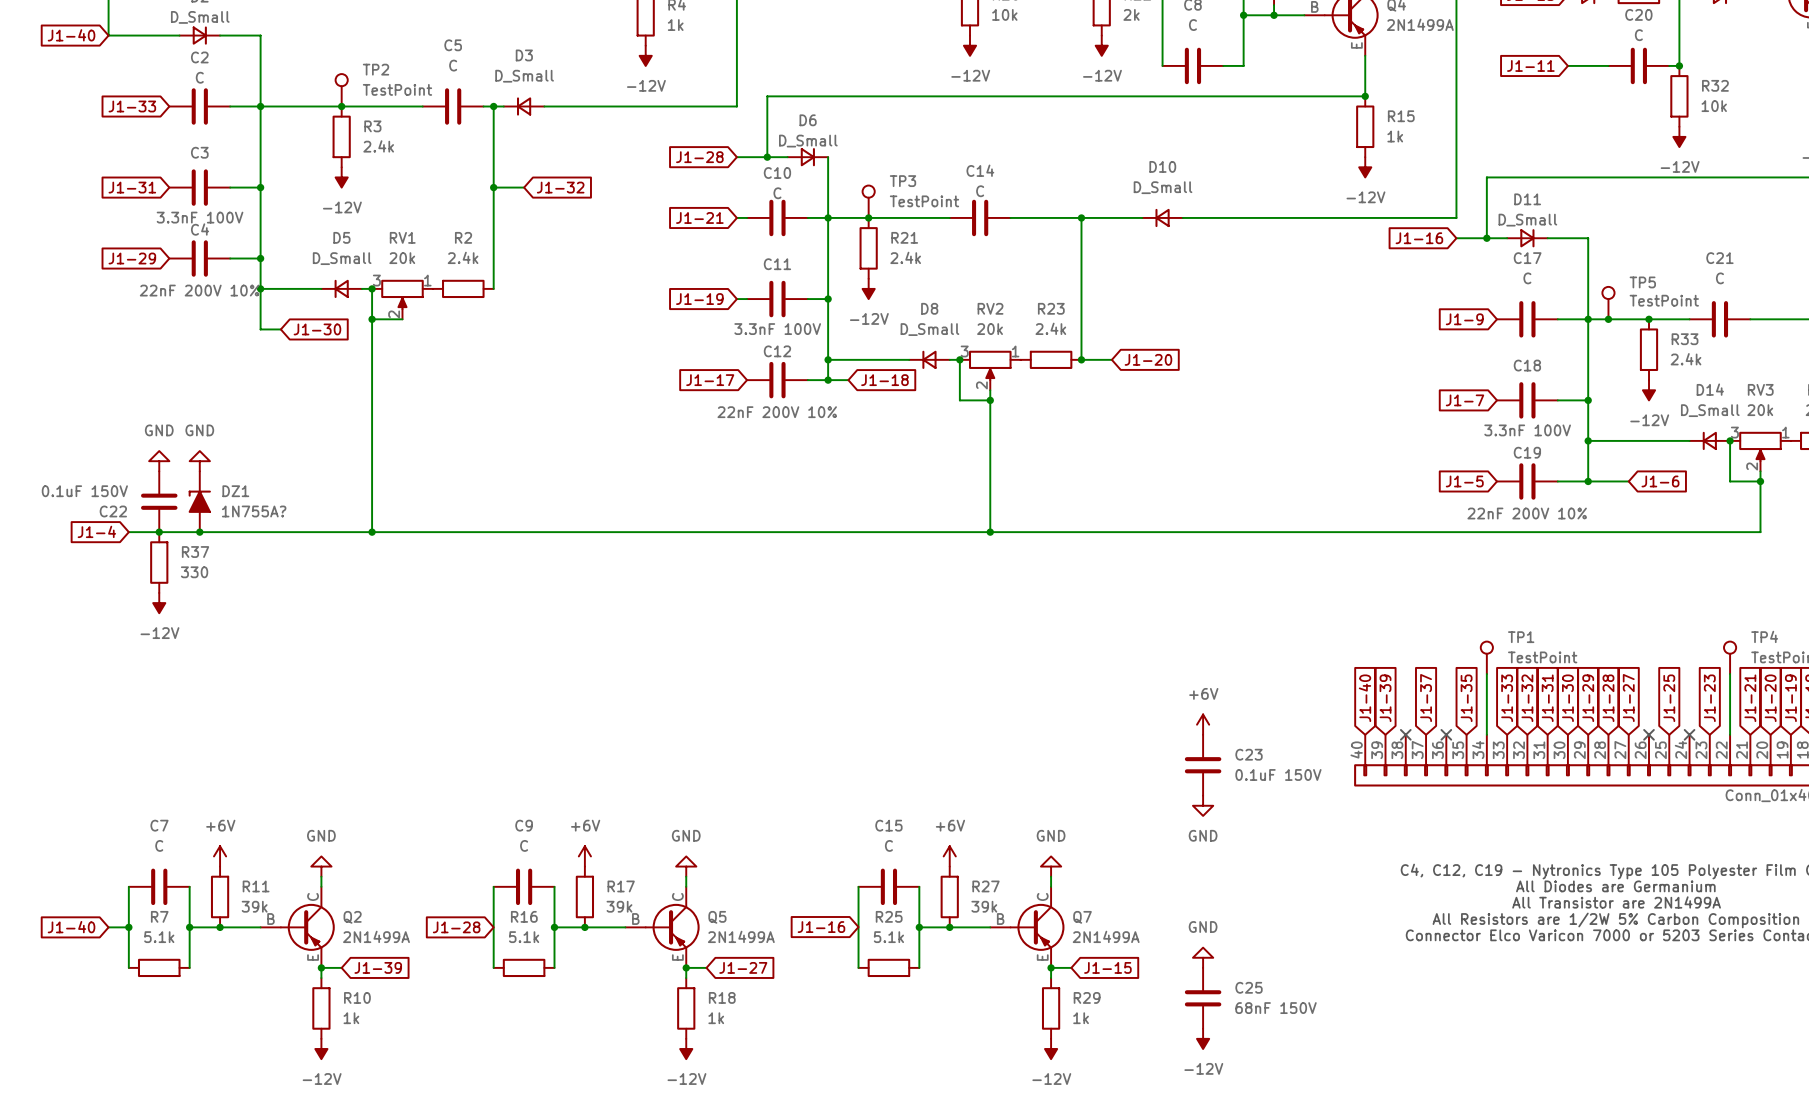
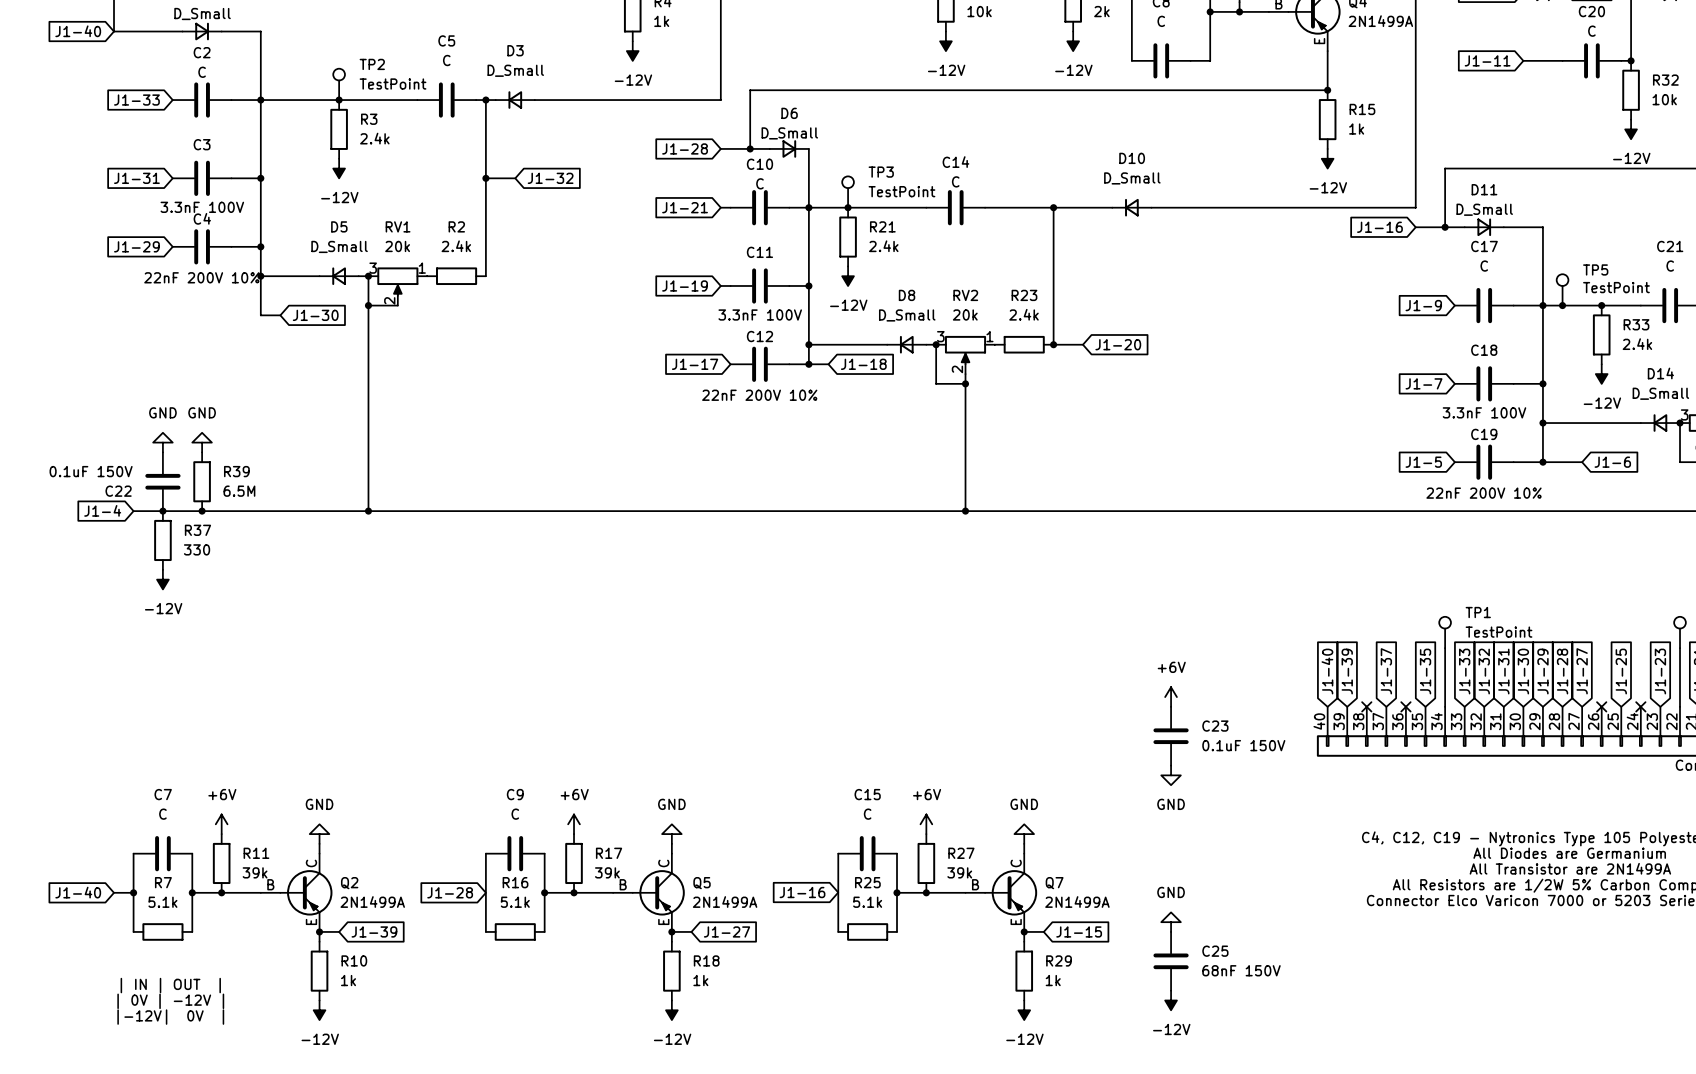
DZ1: 1N755A? (199, 501) -> none
R39: none -> 6.5M (202, 481)
text: none -> | IN | OUT | (170, 985)
text: none -> | 0V | -12V | (170, 1001)
text: none -> |-12V| 0V | (170, 1017)

